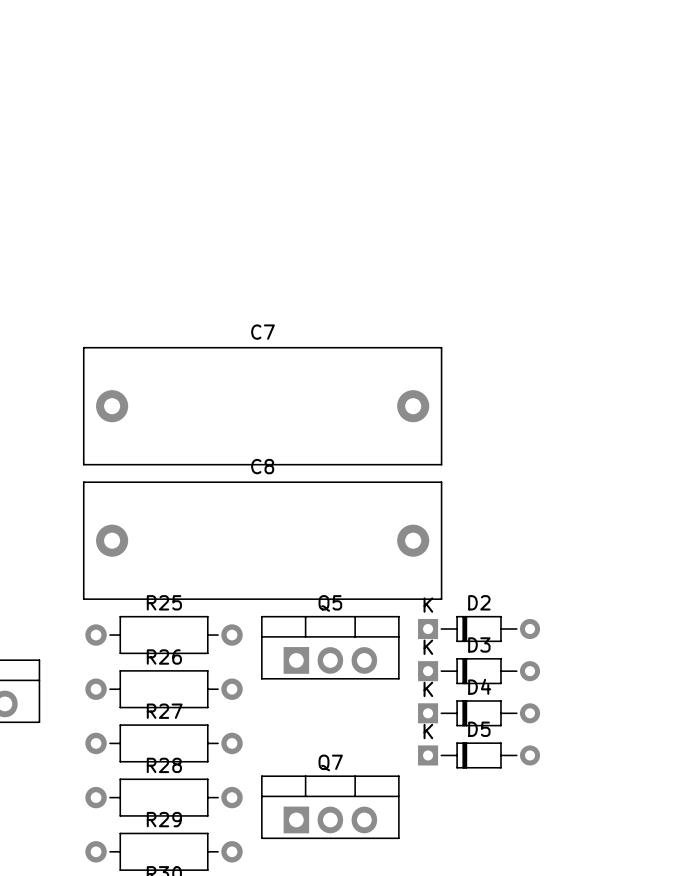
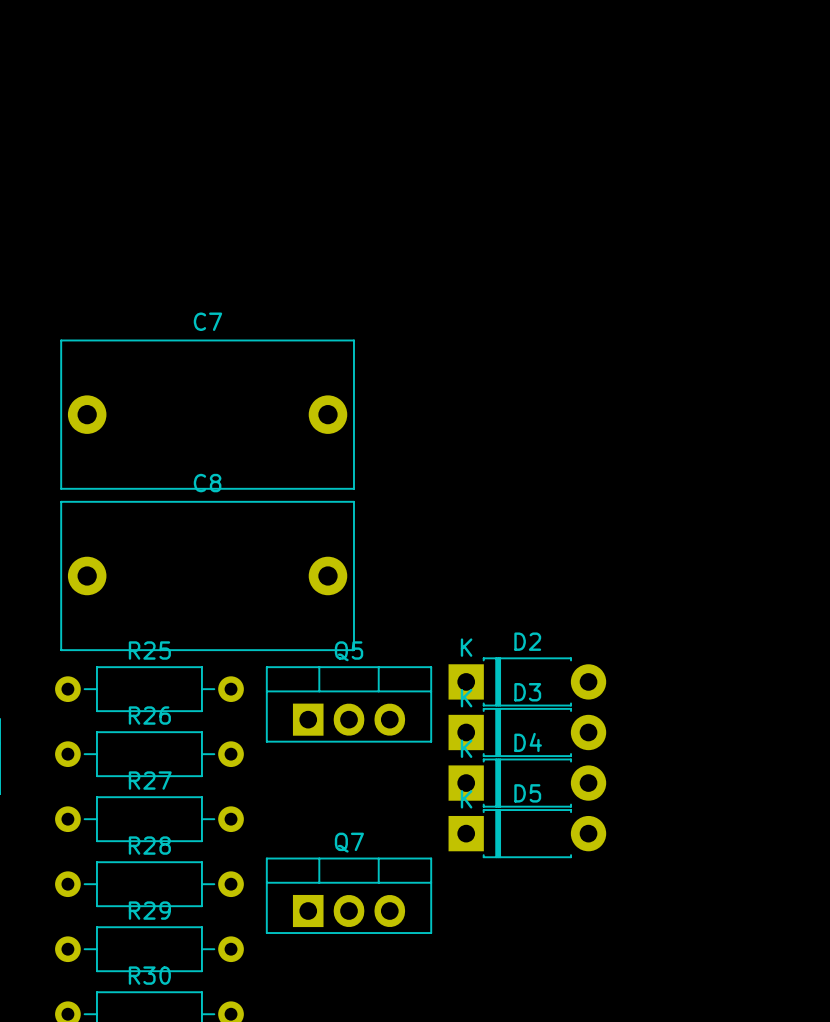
C7 footprint: [82, 346, 443, 466] -> [60, 339, 355, 490]
C8 footprint: [82, 481, 443, 600] -> [60, 500, 355, 652]
D2 footprint: [418, 615, 541, 643] -> [448, 657, 607, 707]
D3 footprint: [418, 658, 541, 685] -> [448, 707, 607, 758]
D4 footprint: [418, 700, 541, 727] -> [448, 758, 607, 808]
D5 footprint: [418, 742, 541, 769] -> [448, 809, 607, 859]

